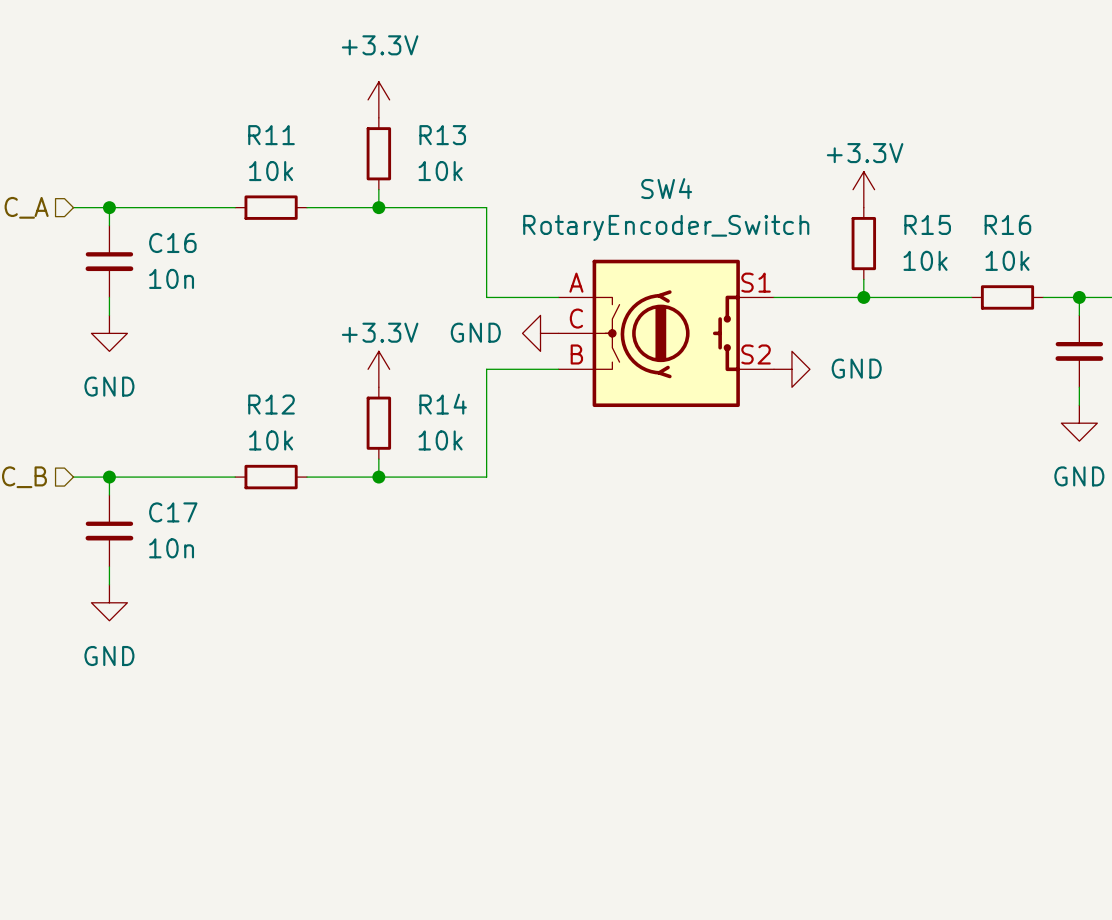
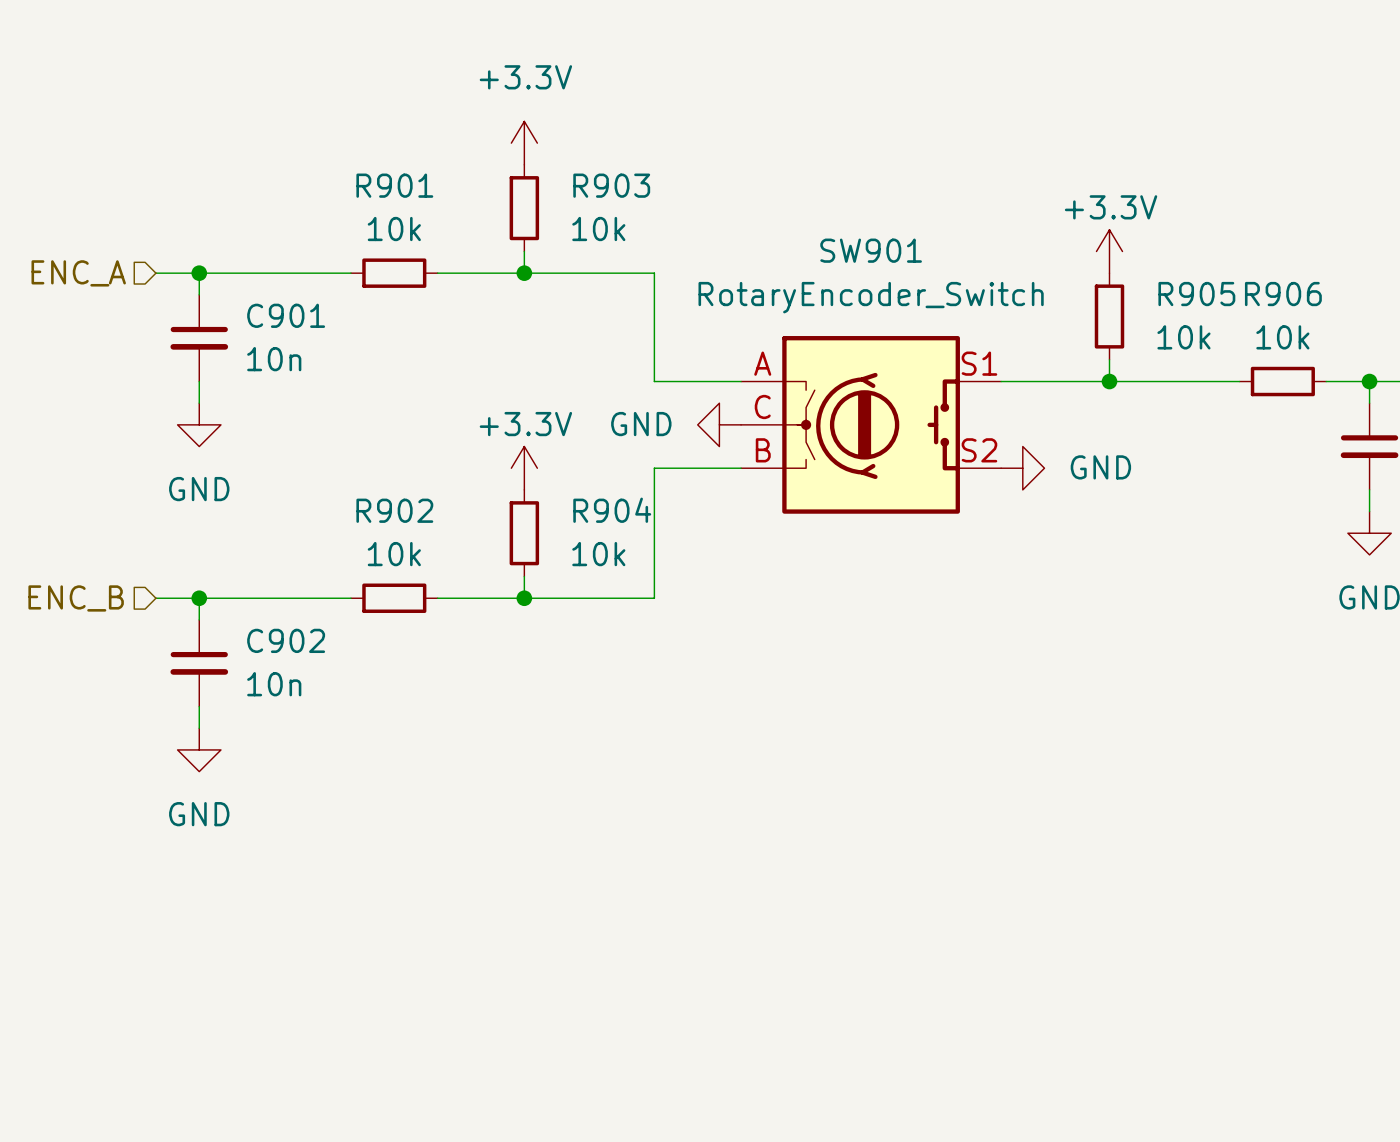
R11 name: R11 (271, 135) -> R901 (394, 185)
R13 name: R13 (442, 135) -> R903 (611, 185)
SW4 name: SW4 (666, 188) -> SW901 (871, 250)
R15 name: R15 (927, 224) -> R905 (1196, 294)
R16 name: R16 (1007, 224) -> R906 (1283, 294)
C16 name: C16 (172, 242) -> C901 (286, 315)
R12 name: R12 (271, 404) -> R902 (394, 510)
R14 name: R14 (443, 404) -> R904 (612, 510)
C17 name: C17 (173, 512) -> C902 (286, 640)

